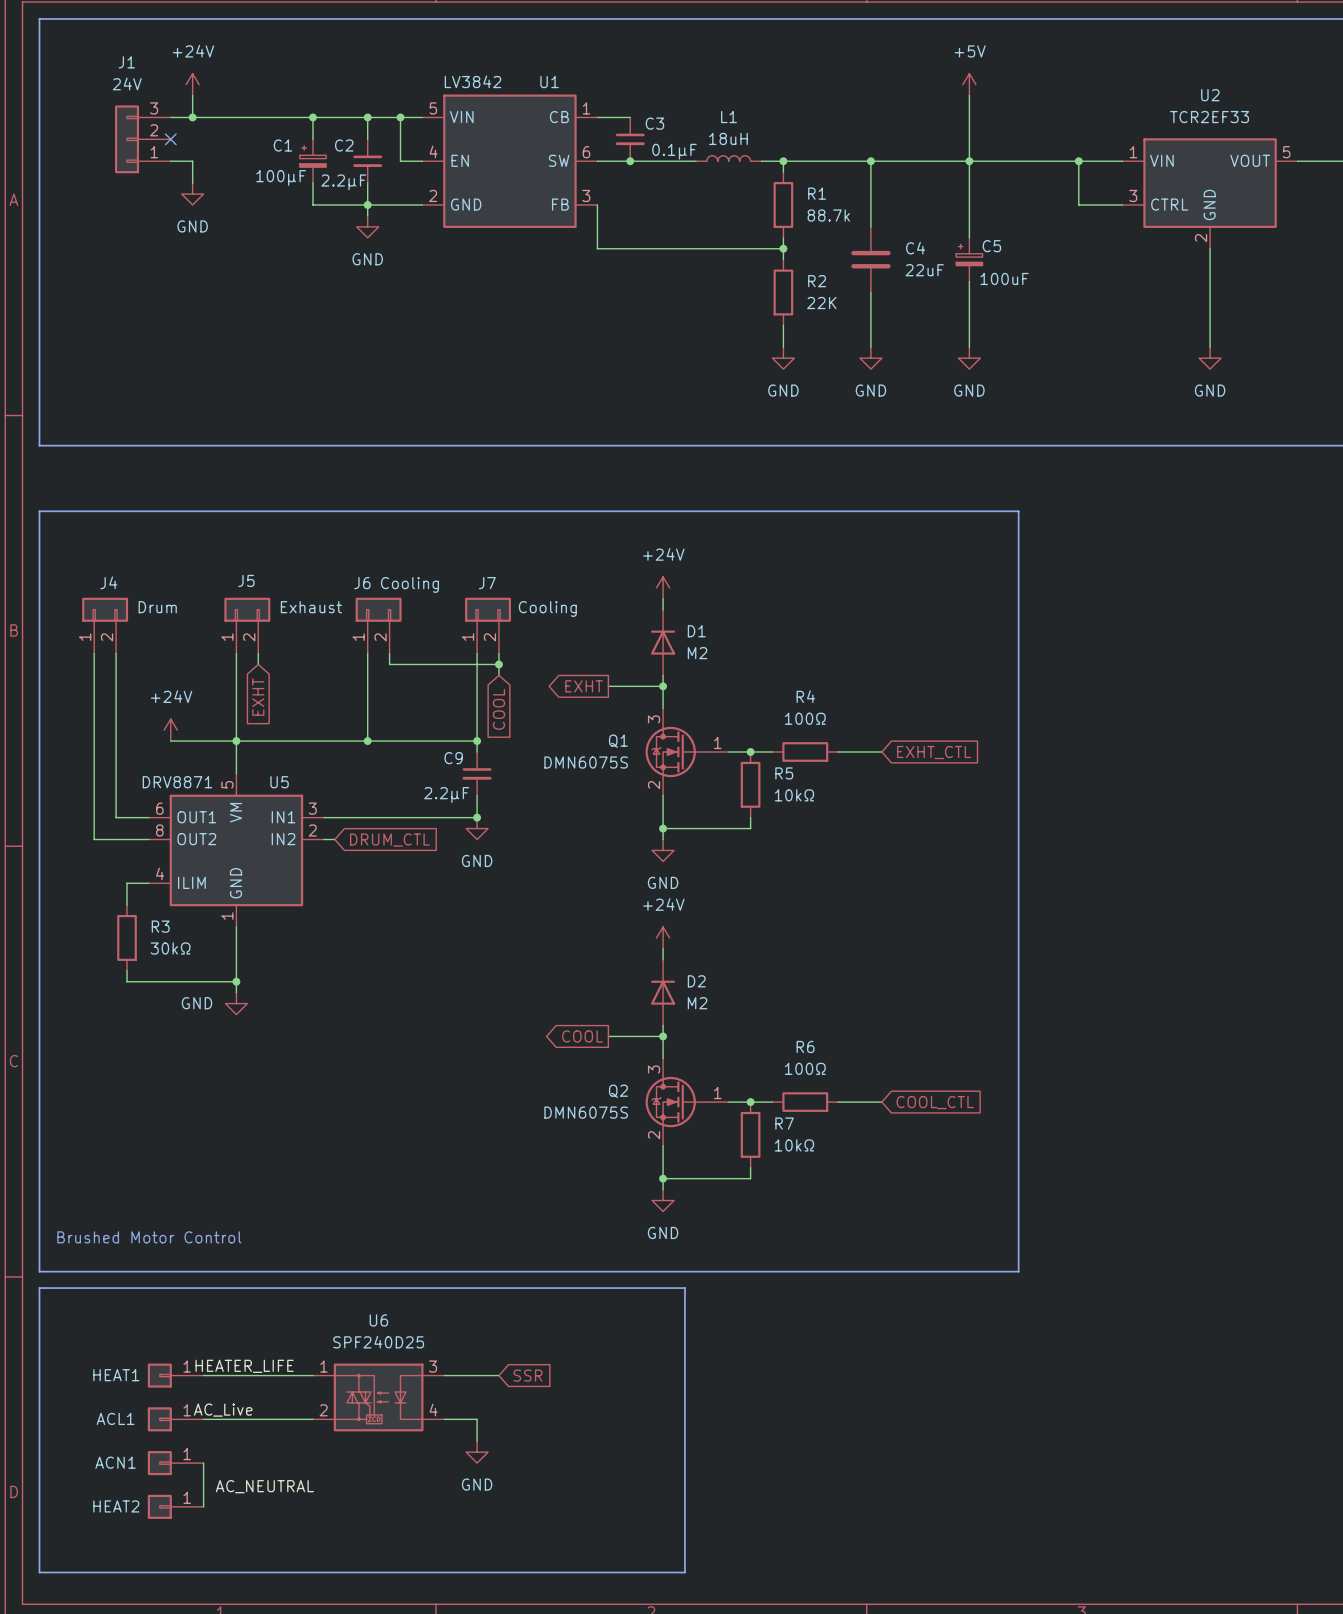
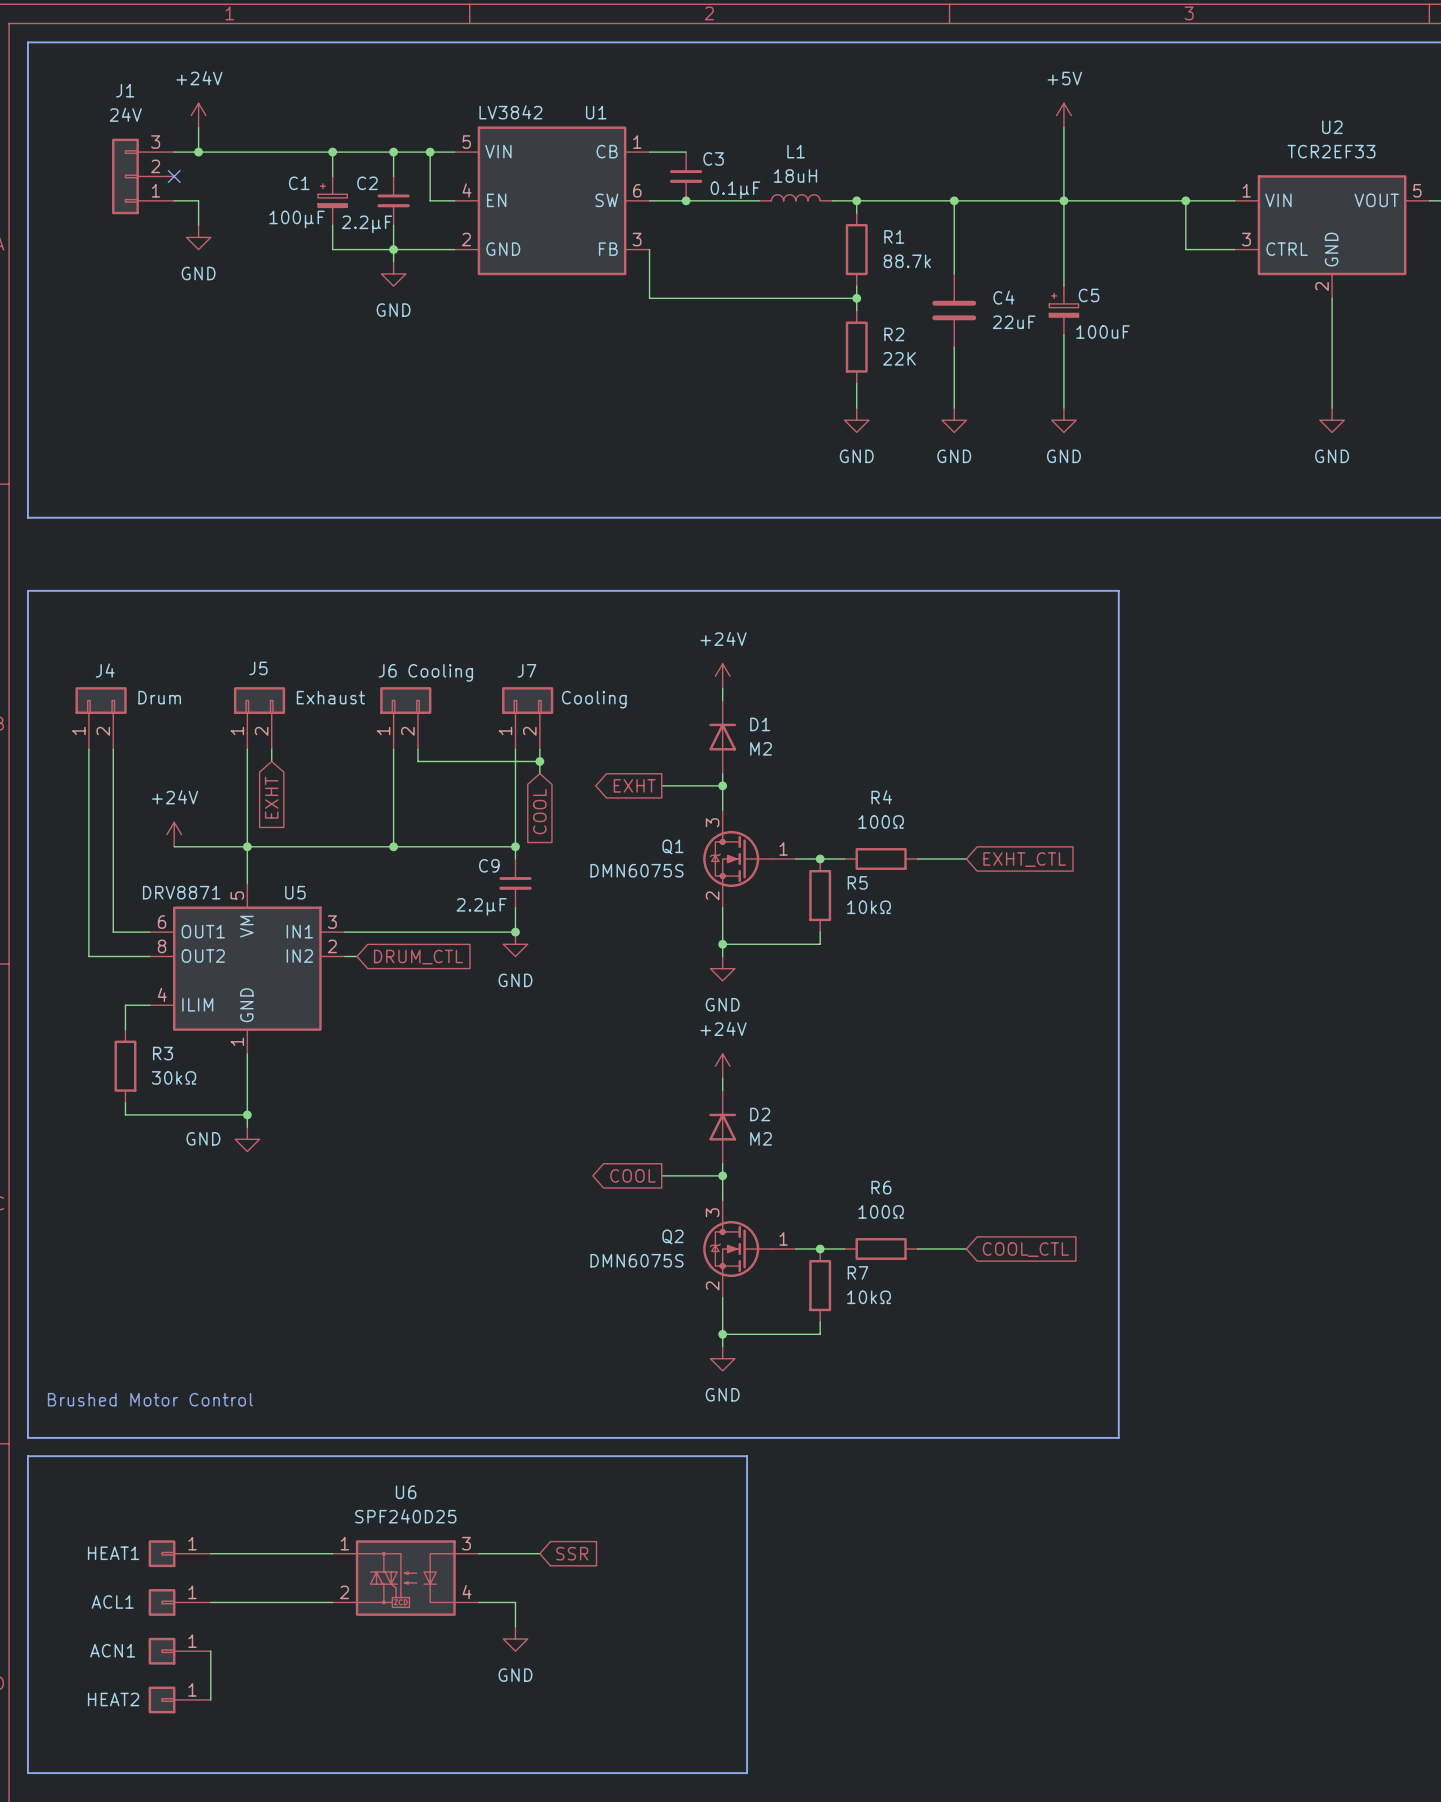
label: HEATER_LIFE (244, 1366) -> none
label: AC_Live (223, 1410) -> none
label: AC_NEUTRAL (264, 1486) -> none

